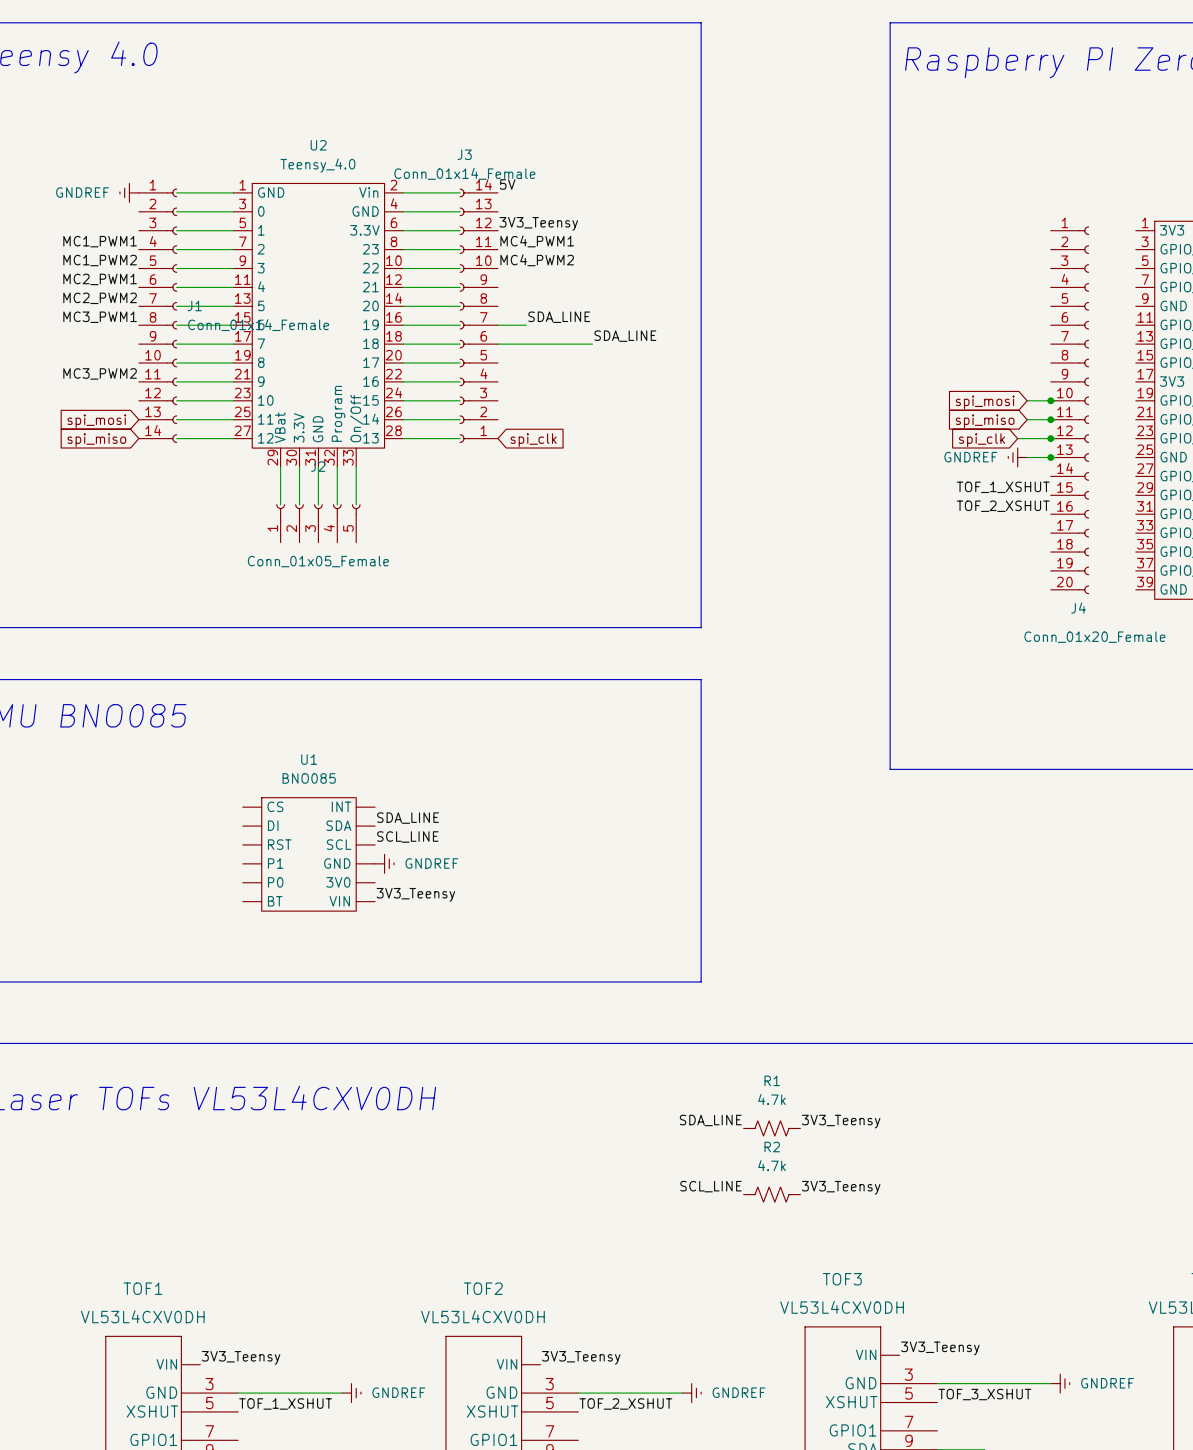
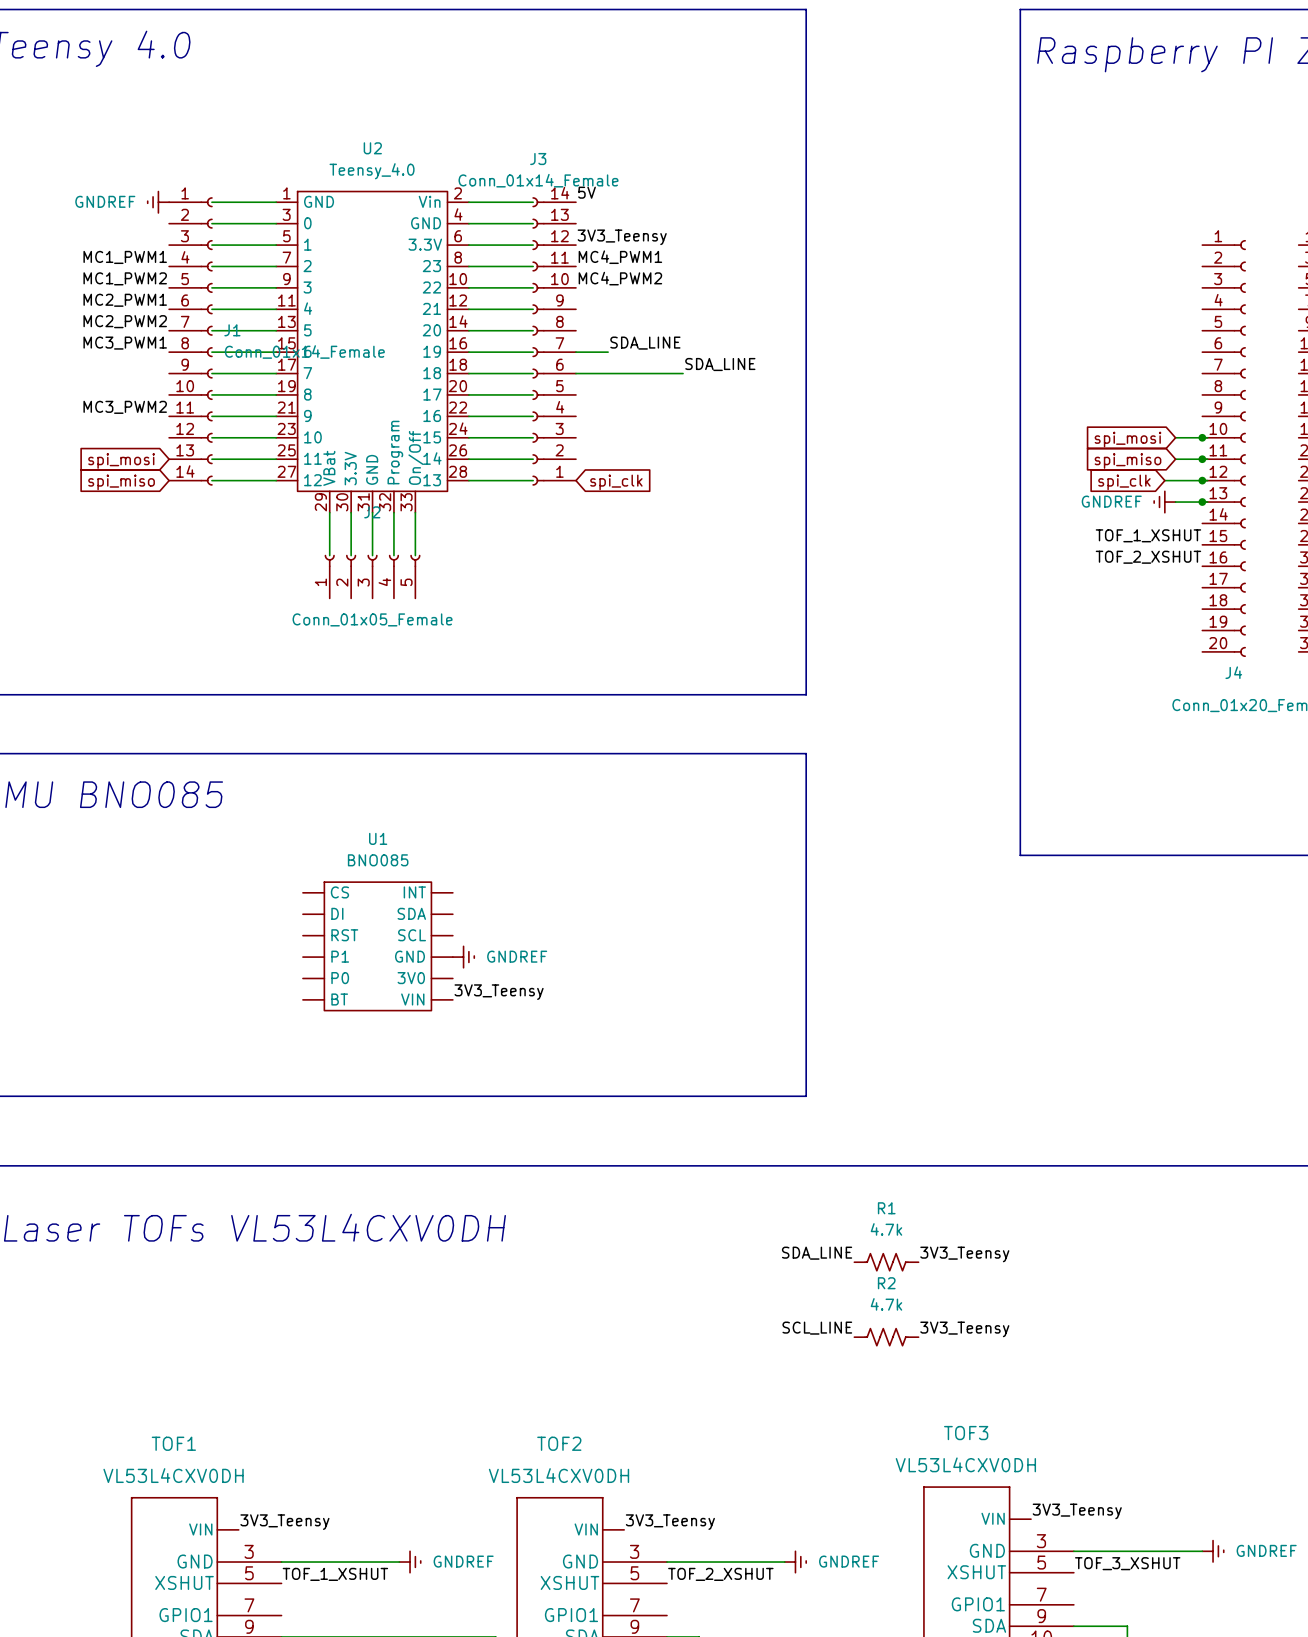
label: SDA_LINE (408, 818) -> none
label: SCL_LINE (407, 836) -> none
U1 position: (308, 854) -> (377, 946)
power symbol position: GNDREF (384, 863) -> GNDREF (463, 957)
label position: 3V3_Teensy (415, 894) -> 3V3_Teensy (499, 992)

